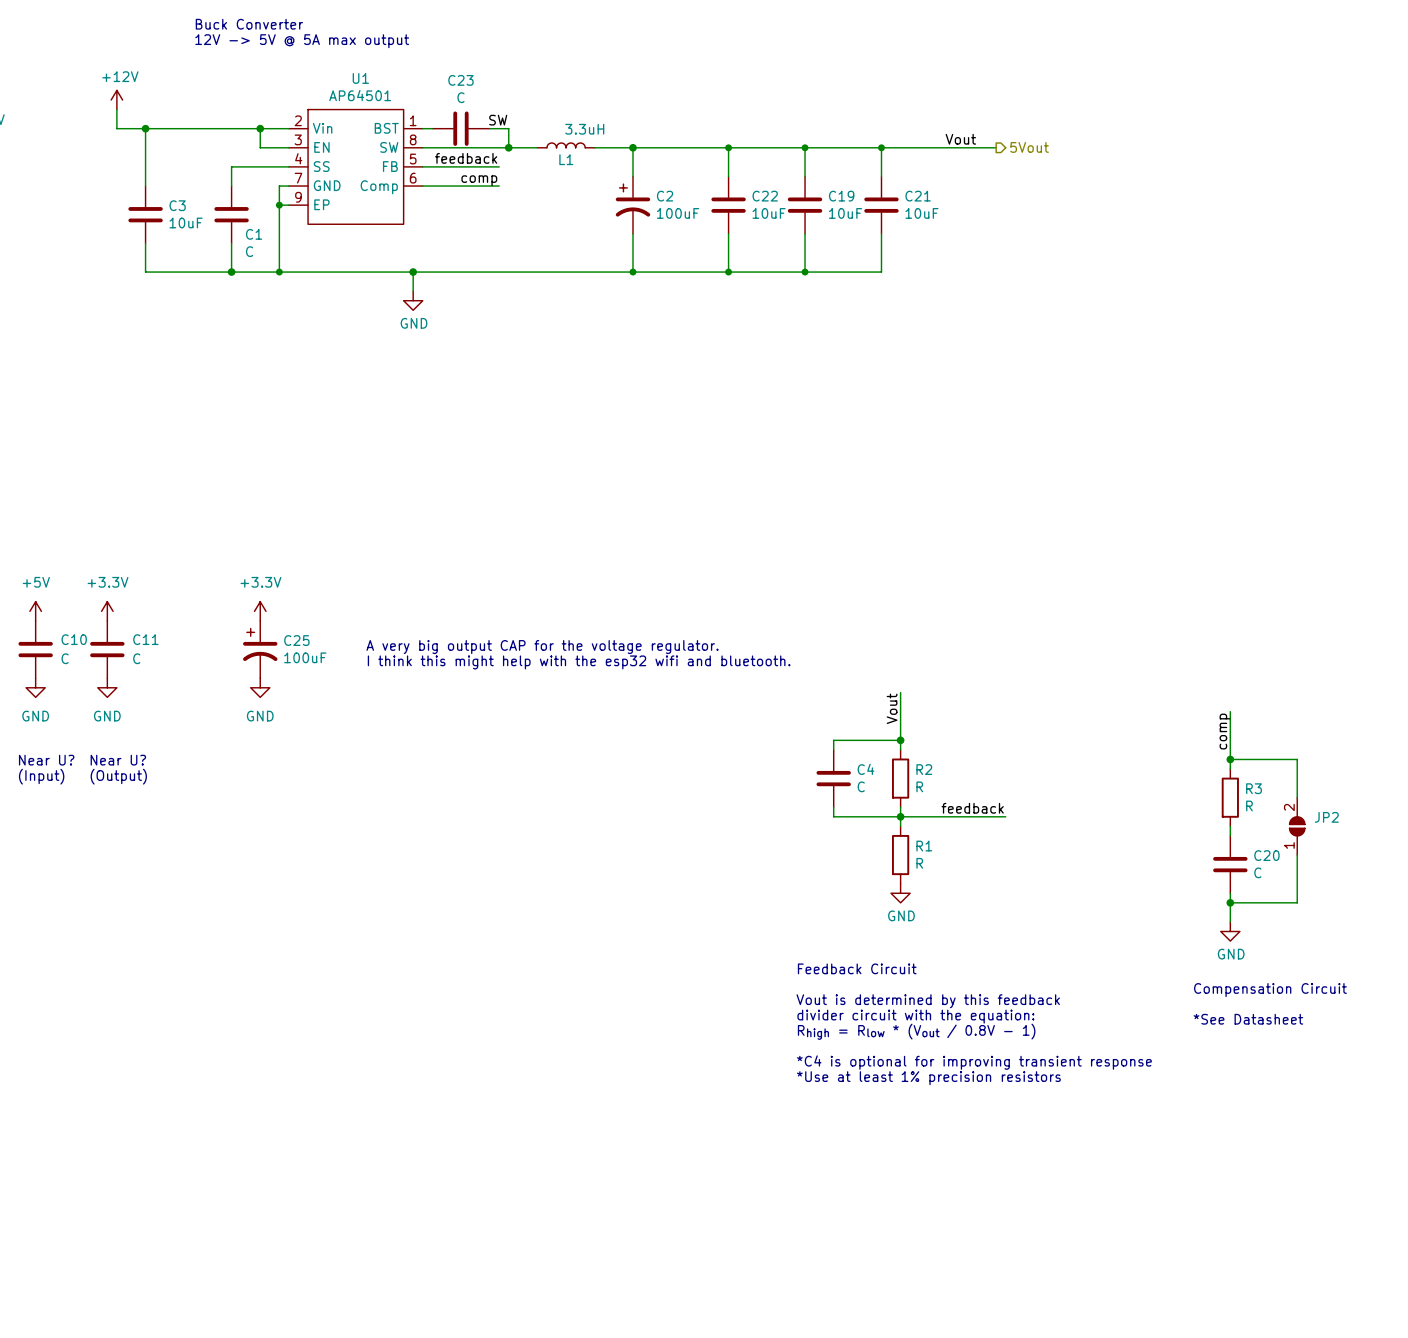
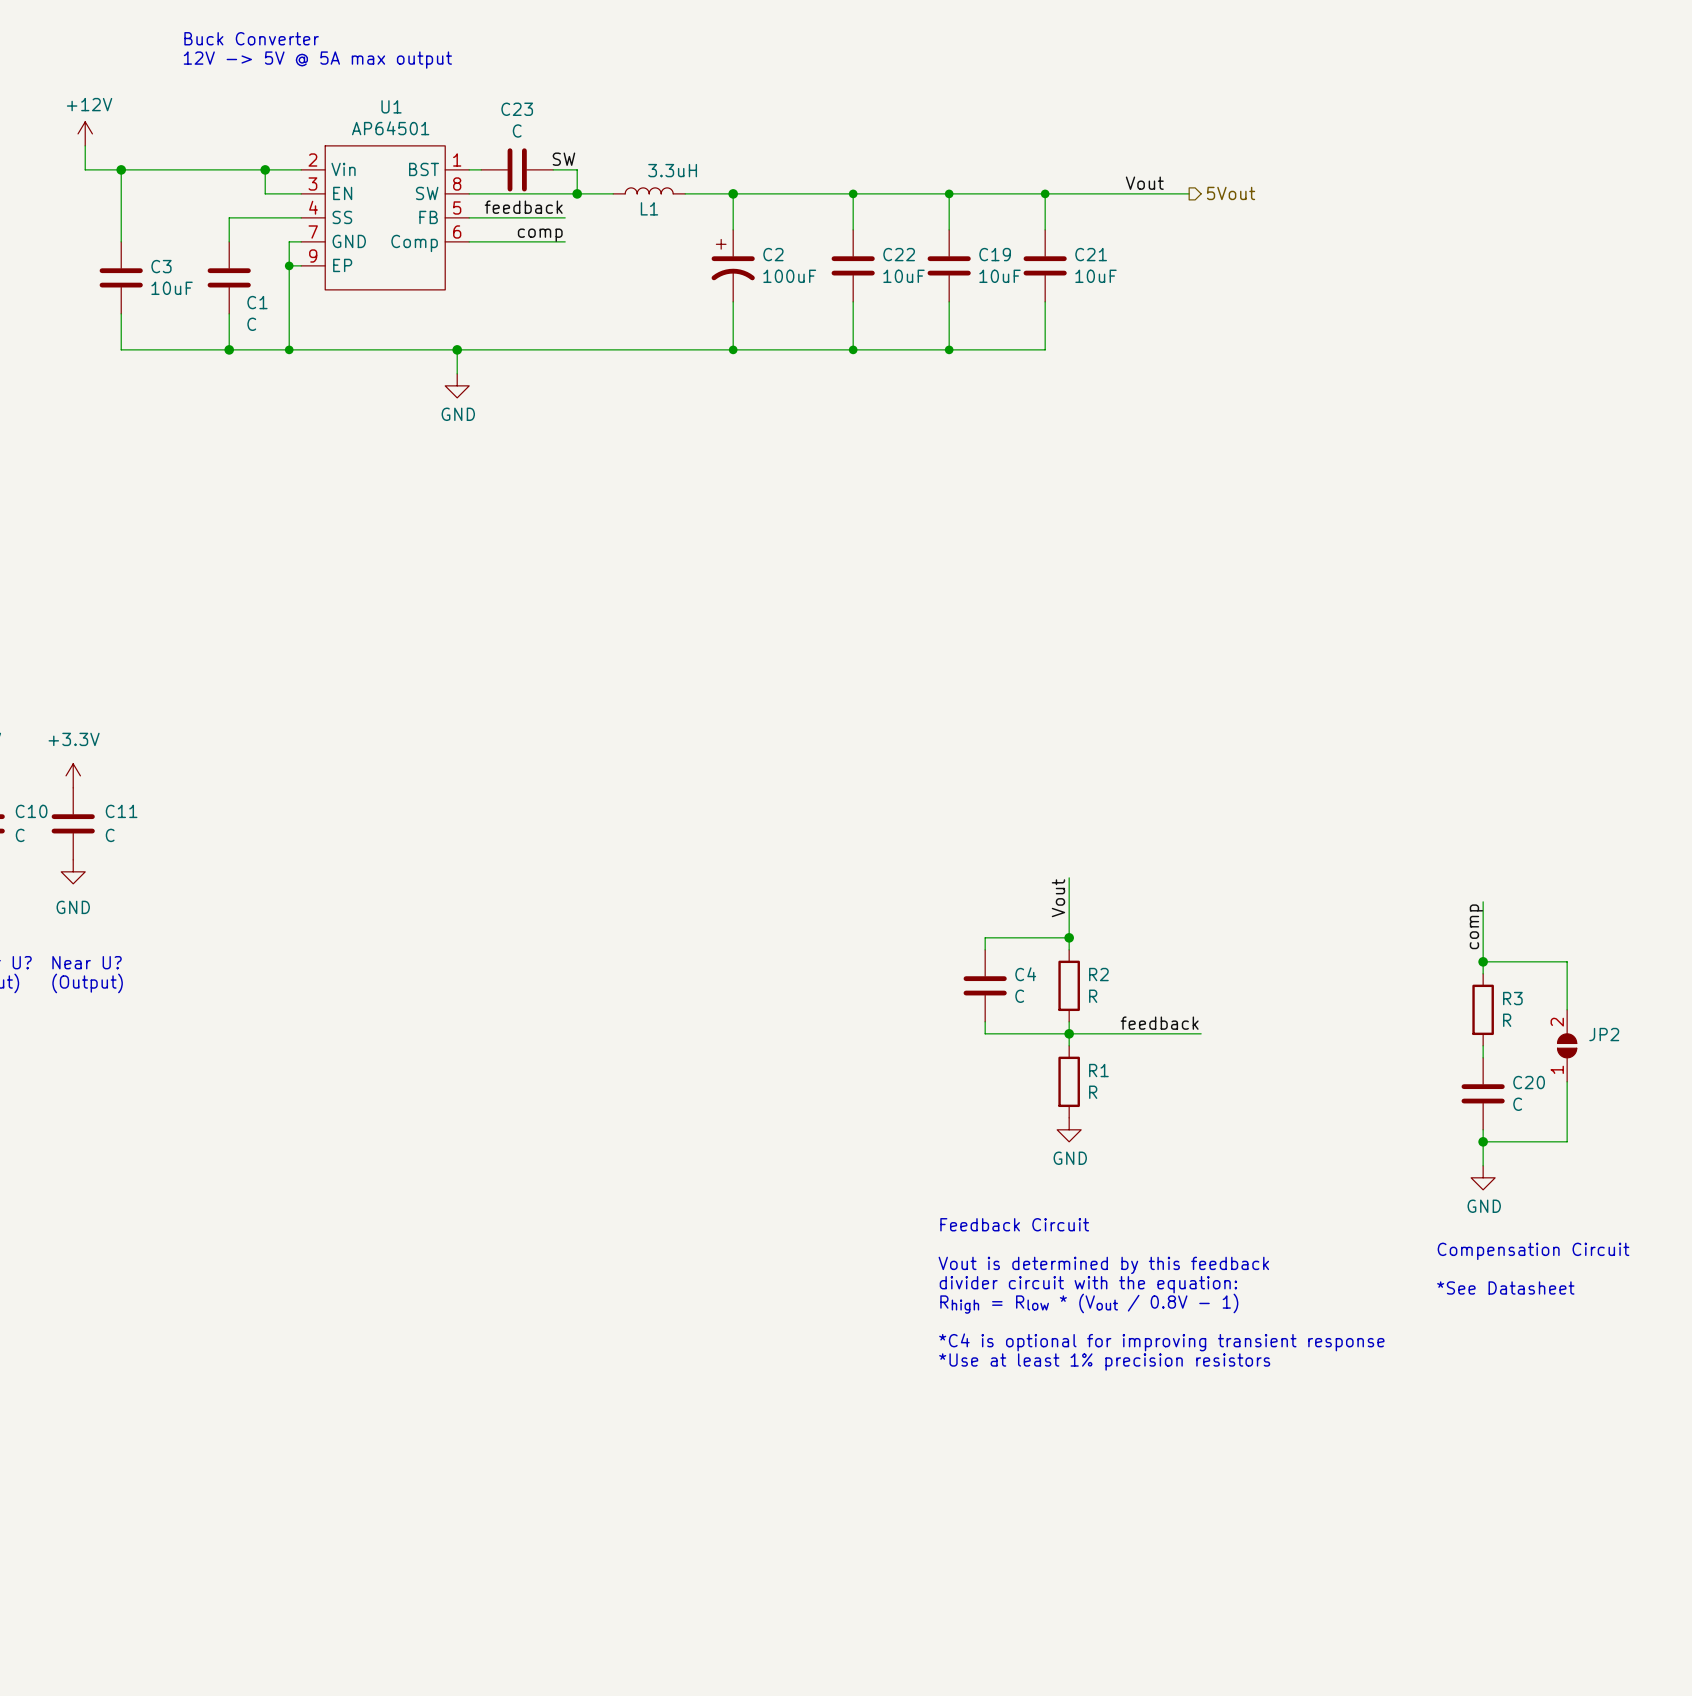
power symbol: +3.3V (260, 611) -> none
text: A very big output CAP for the voltage regulator. (542, 647) -> none
C25: 100uF (260, 649) -> none
text: I think this might help with the esp32 wifi and bluetooth. (579, 662) -> none
power symbol: GND (260, 687) -> none

